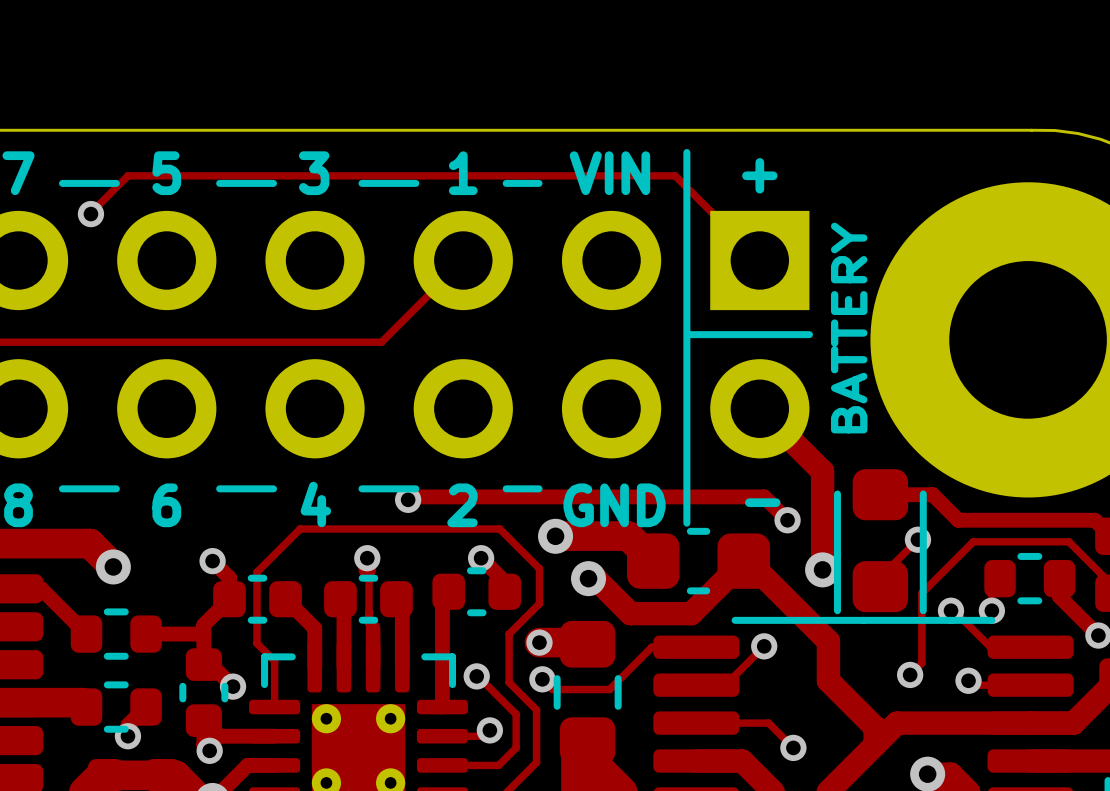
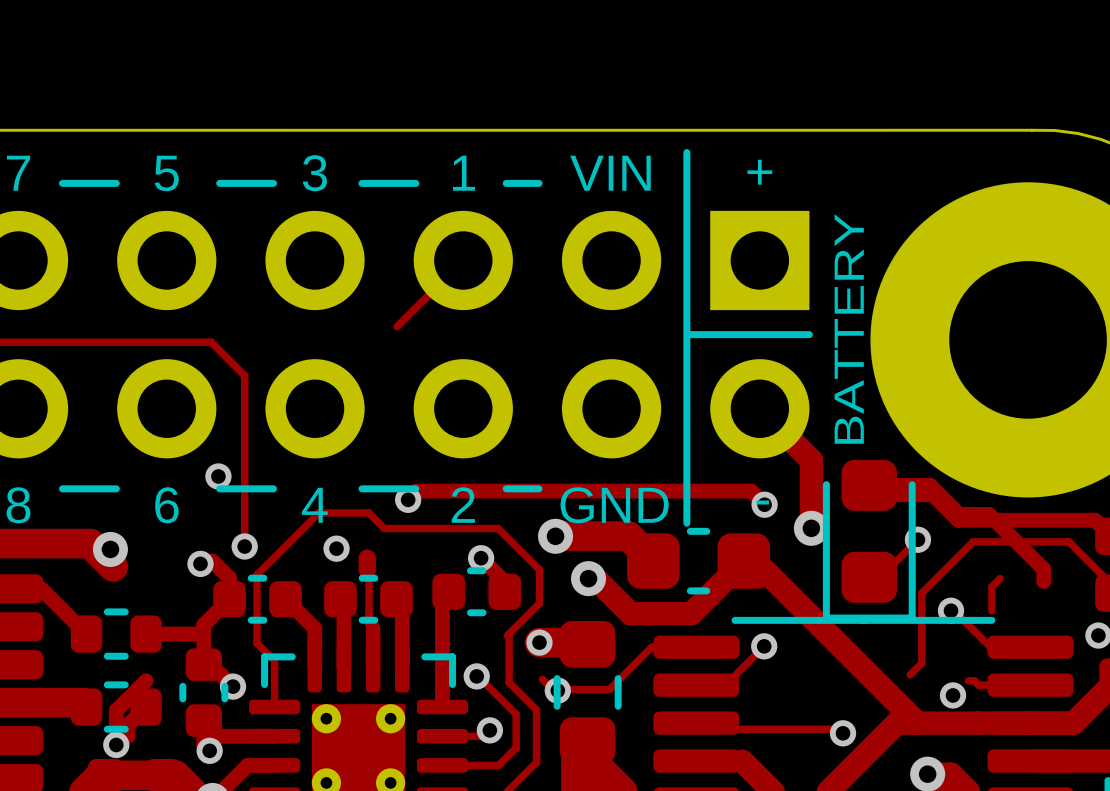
via: (90, 214) -> none
track: (87, 216) (127, 175) (675, 175) (759, 260) -> none
track: (397, 326) (381, 342) (211, 342) -> (244, 546) (244, 375) (211, 342)
track: (811, 460) (822, 471) (822, 569) -> (811, 460) (811, 528)
part footprint: [833, 469, 927, 615] -> [822, 459, 916, 622]
via: none -> (218, 476)
track: none -> (869, 485) (930, 485) (959, 514) (988, 514) (1043, 569) (1043, 581)
track: (411, 496) (764, 496) (787, 520) -> (411, 496) (416, 491) (750, 491) (764, 504)
via position: (787, 520) -> (764, 504)
via: none -> (244, 546)
via position: (367, 558) -> (336, 548)
via position: (212, 561) -> (200, 563)
track: (748, 561) (828, 641) (828, 680) (875, 727) (875, 744) -> (748, 561) (755, 561) (917, 723)
via position: (113, 566) -> (110, 549)
track: (539, 568) (499, 529) (300, 529) (256, 572) (256, 574) -> (539, 569) (498, 528) (384, 528) (368, 512) (318, 512) (256, 574)
via position: (822, 569) -> (811, 528)
part: (1029, 578) -> none
track: (1059, 578) (1059, 596) (1098, 635) -> none
via: (991, 610) -> none
via: (910, 674) -> none
via position: (542, 679) -> (557, 690)
track: none -> (146, 680) (116, 710) (116, 744)
via position: (968, 680) -> (953, 695)
track: (729, 723) (768, 723) (793, 747) -> (729, 723) (735, 729) (838, 729) (843, 733)
via: none -> (843, 733)
via position: (127, 736) -> (116, 744)
via: (793, 747) -> none

